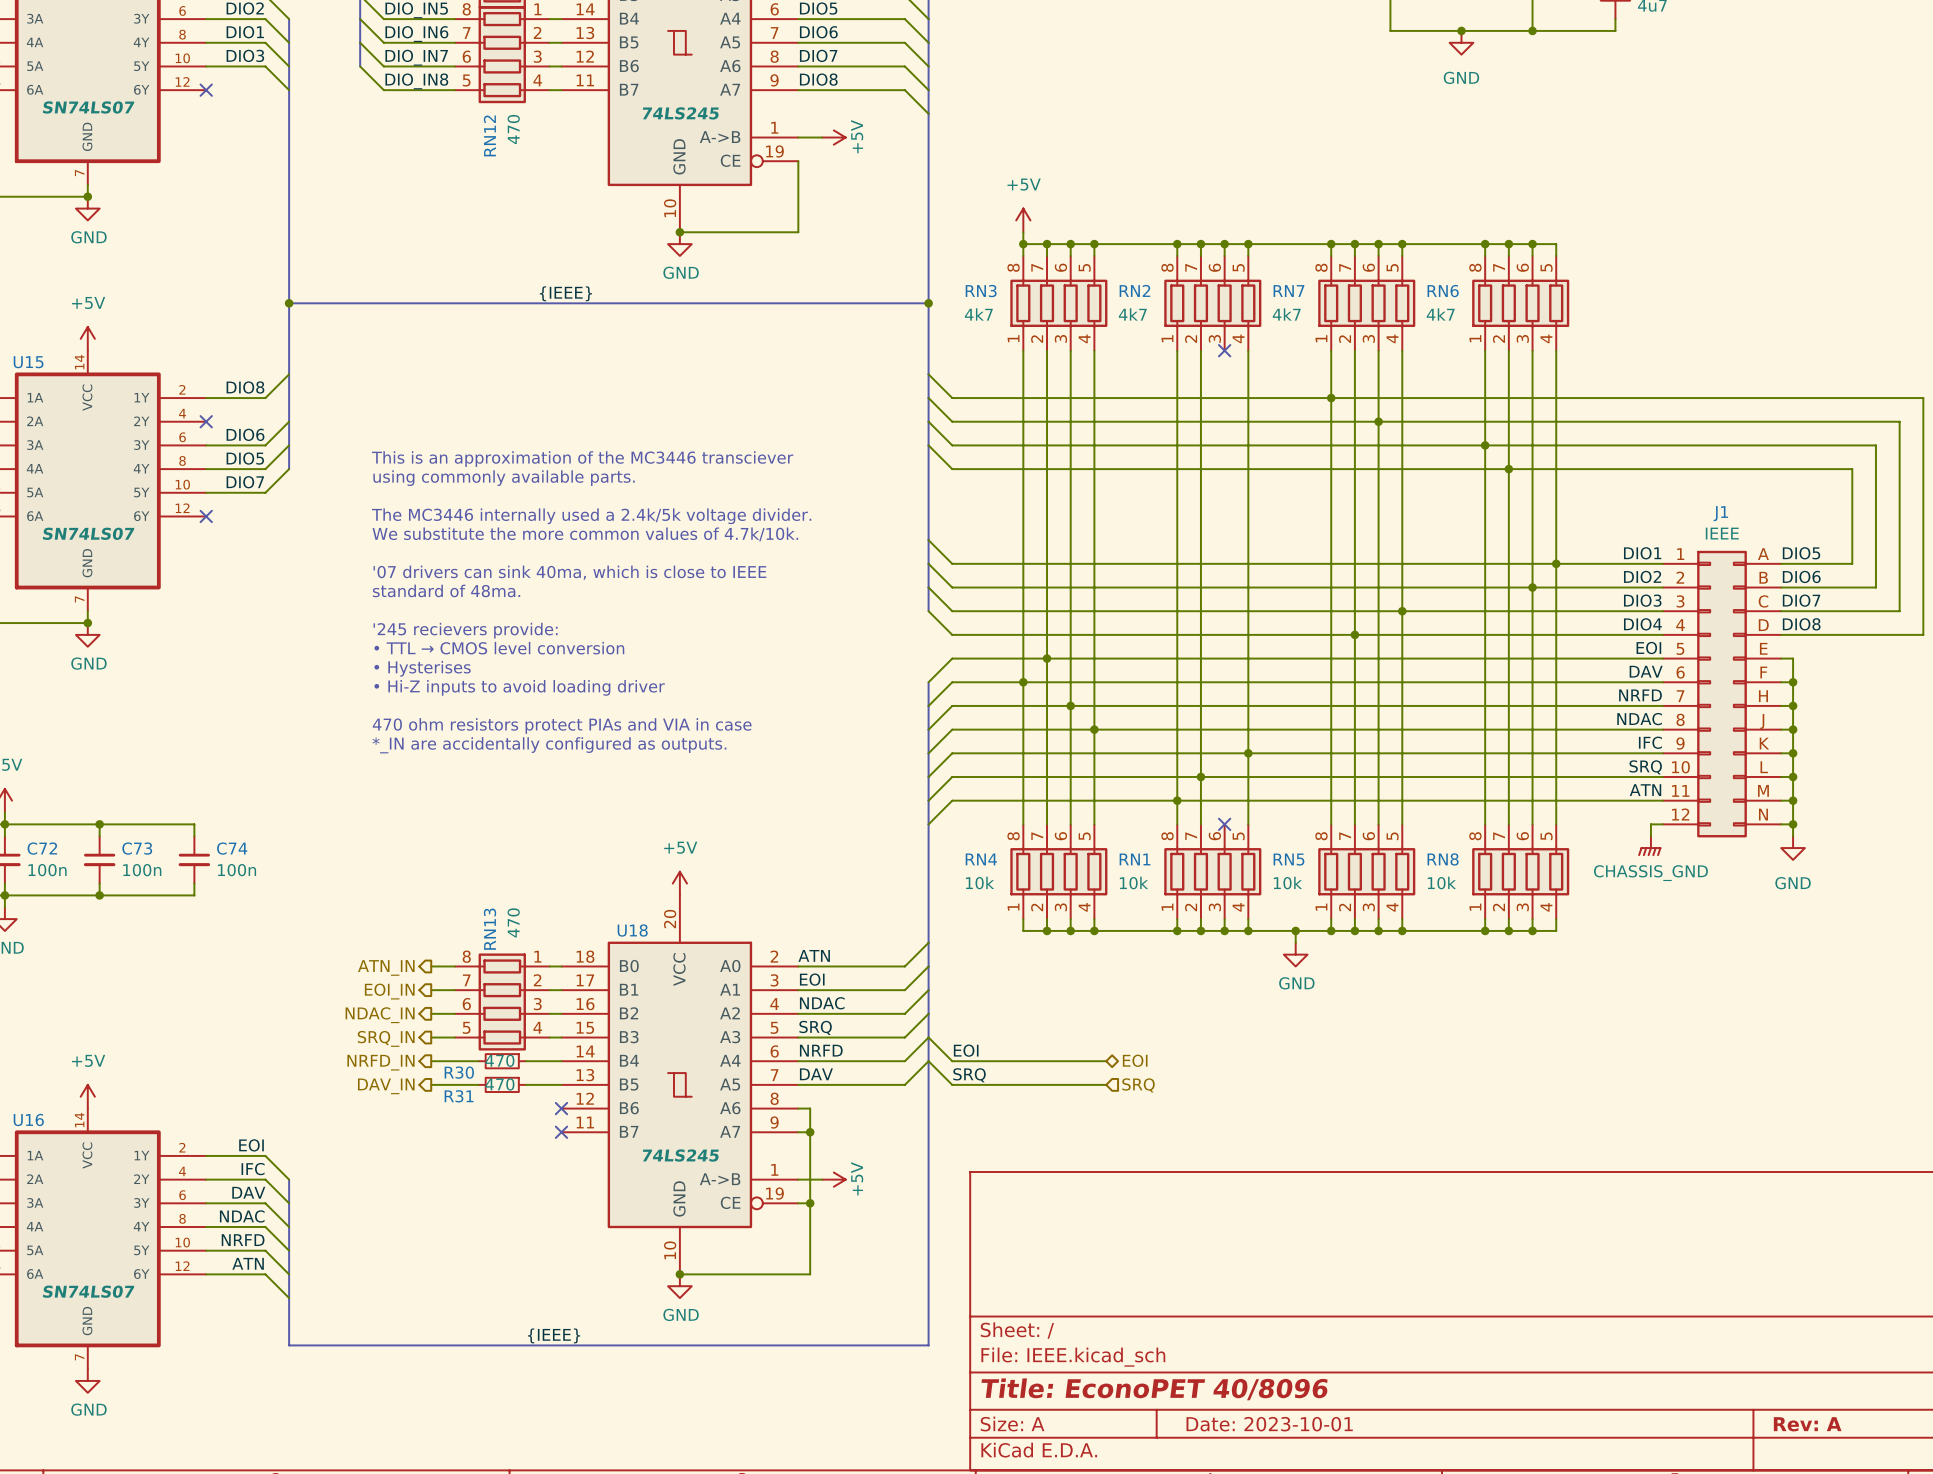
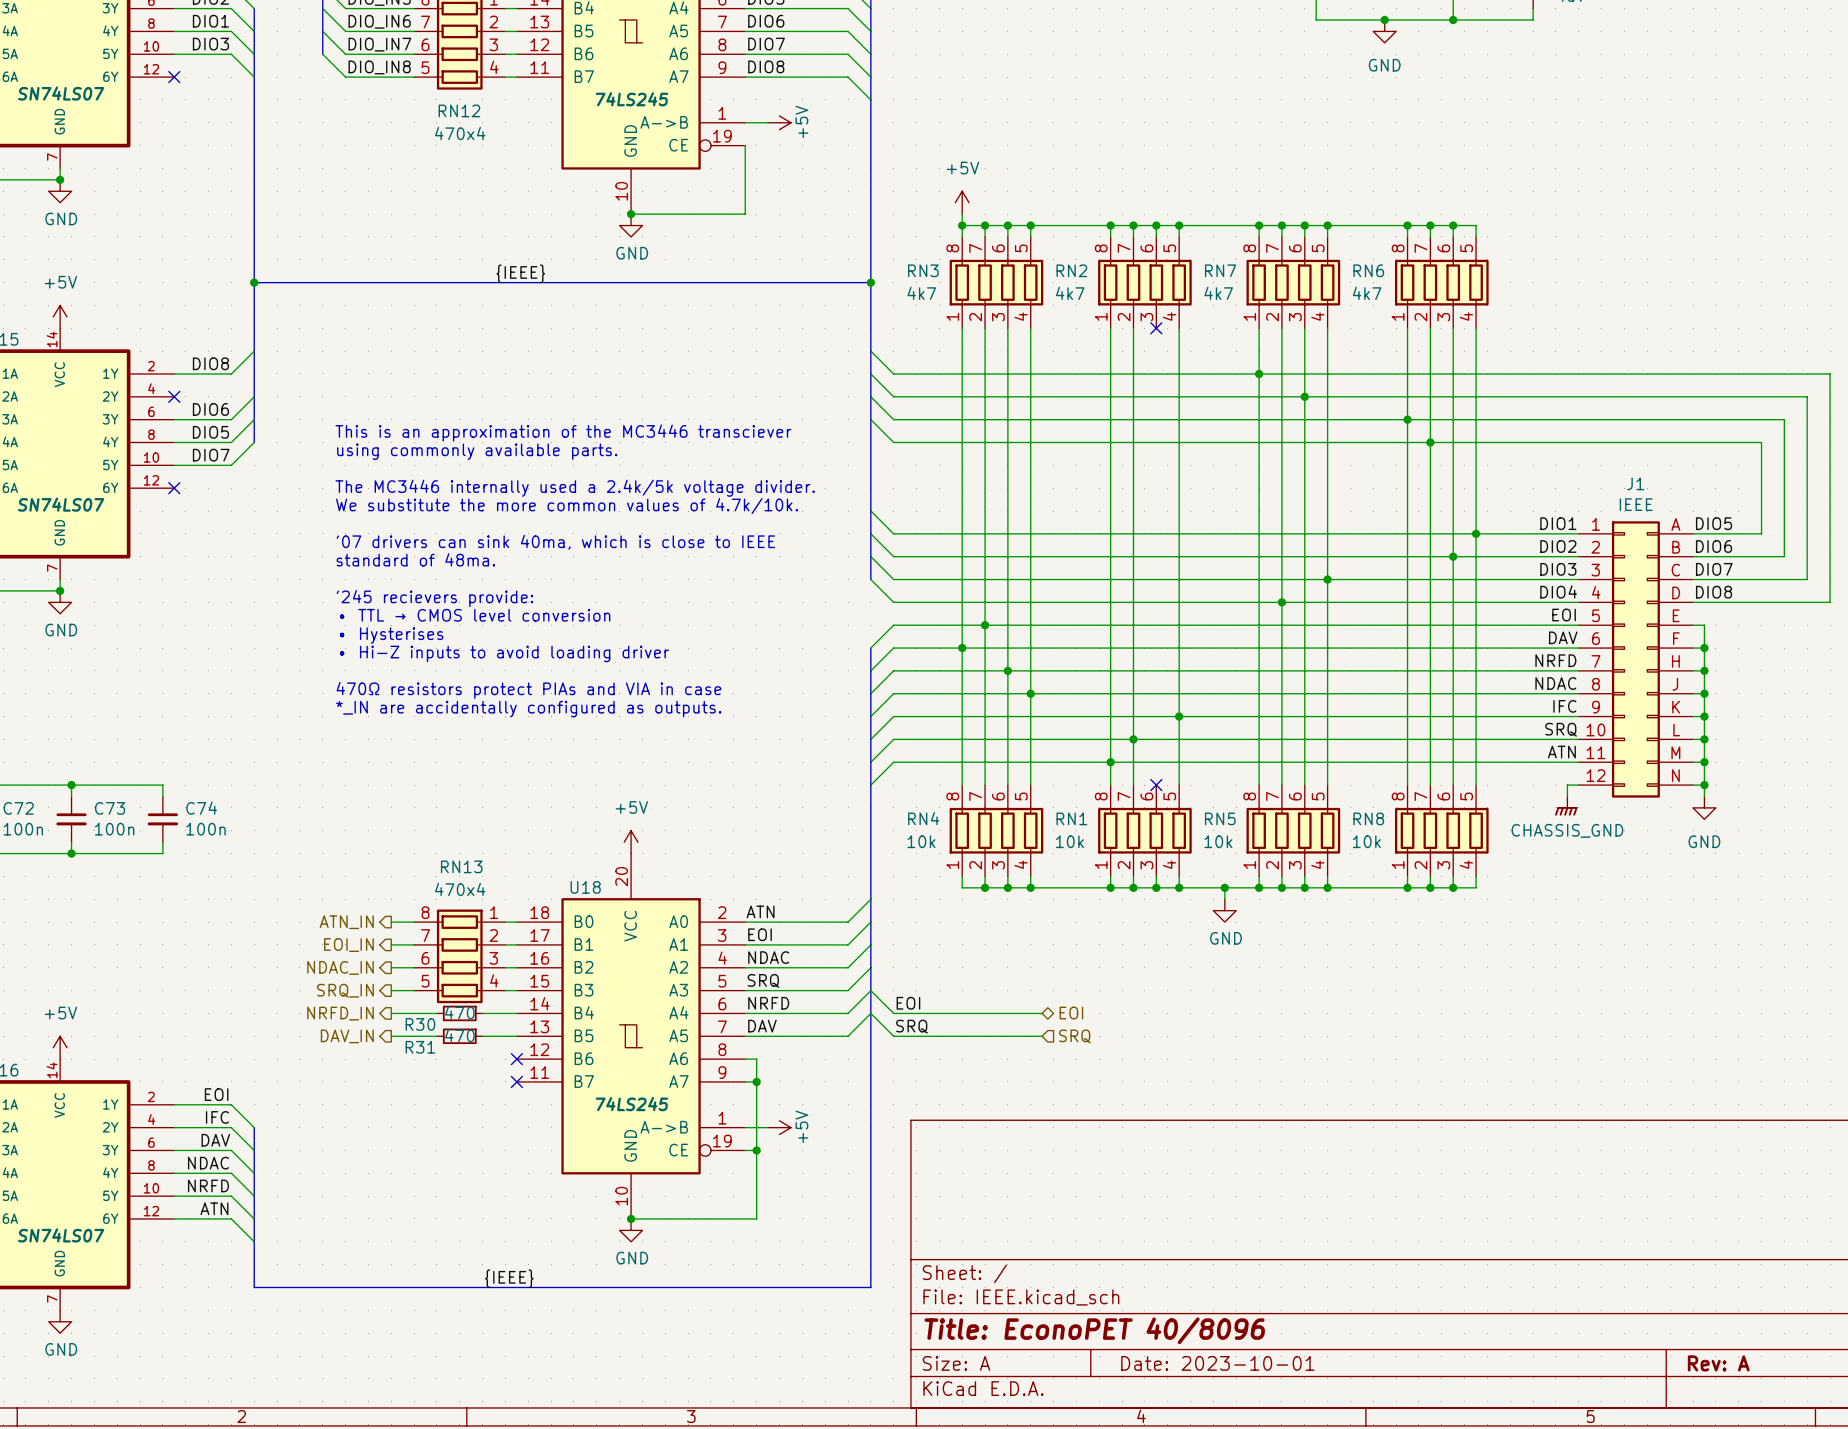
RN12 value: 470 (513, 129) -> 470x4 (460, 133)
RN12 name rotation: 0° (489, 135) -> 90° clockwise (459, 110)
text: 470 ohm resistors protect PIAs and VIA in case (562, 725) -> 470Ω resistors protect PIAs and VIA in case (528, 690)
RN13 value: 470 (513, 922) -> 470x4 (460, 889)
RN13 name rotation: 0° (489, 929) -> 90° clockwise (461, 866)

